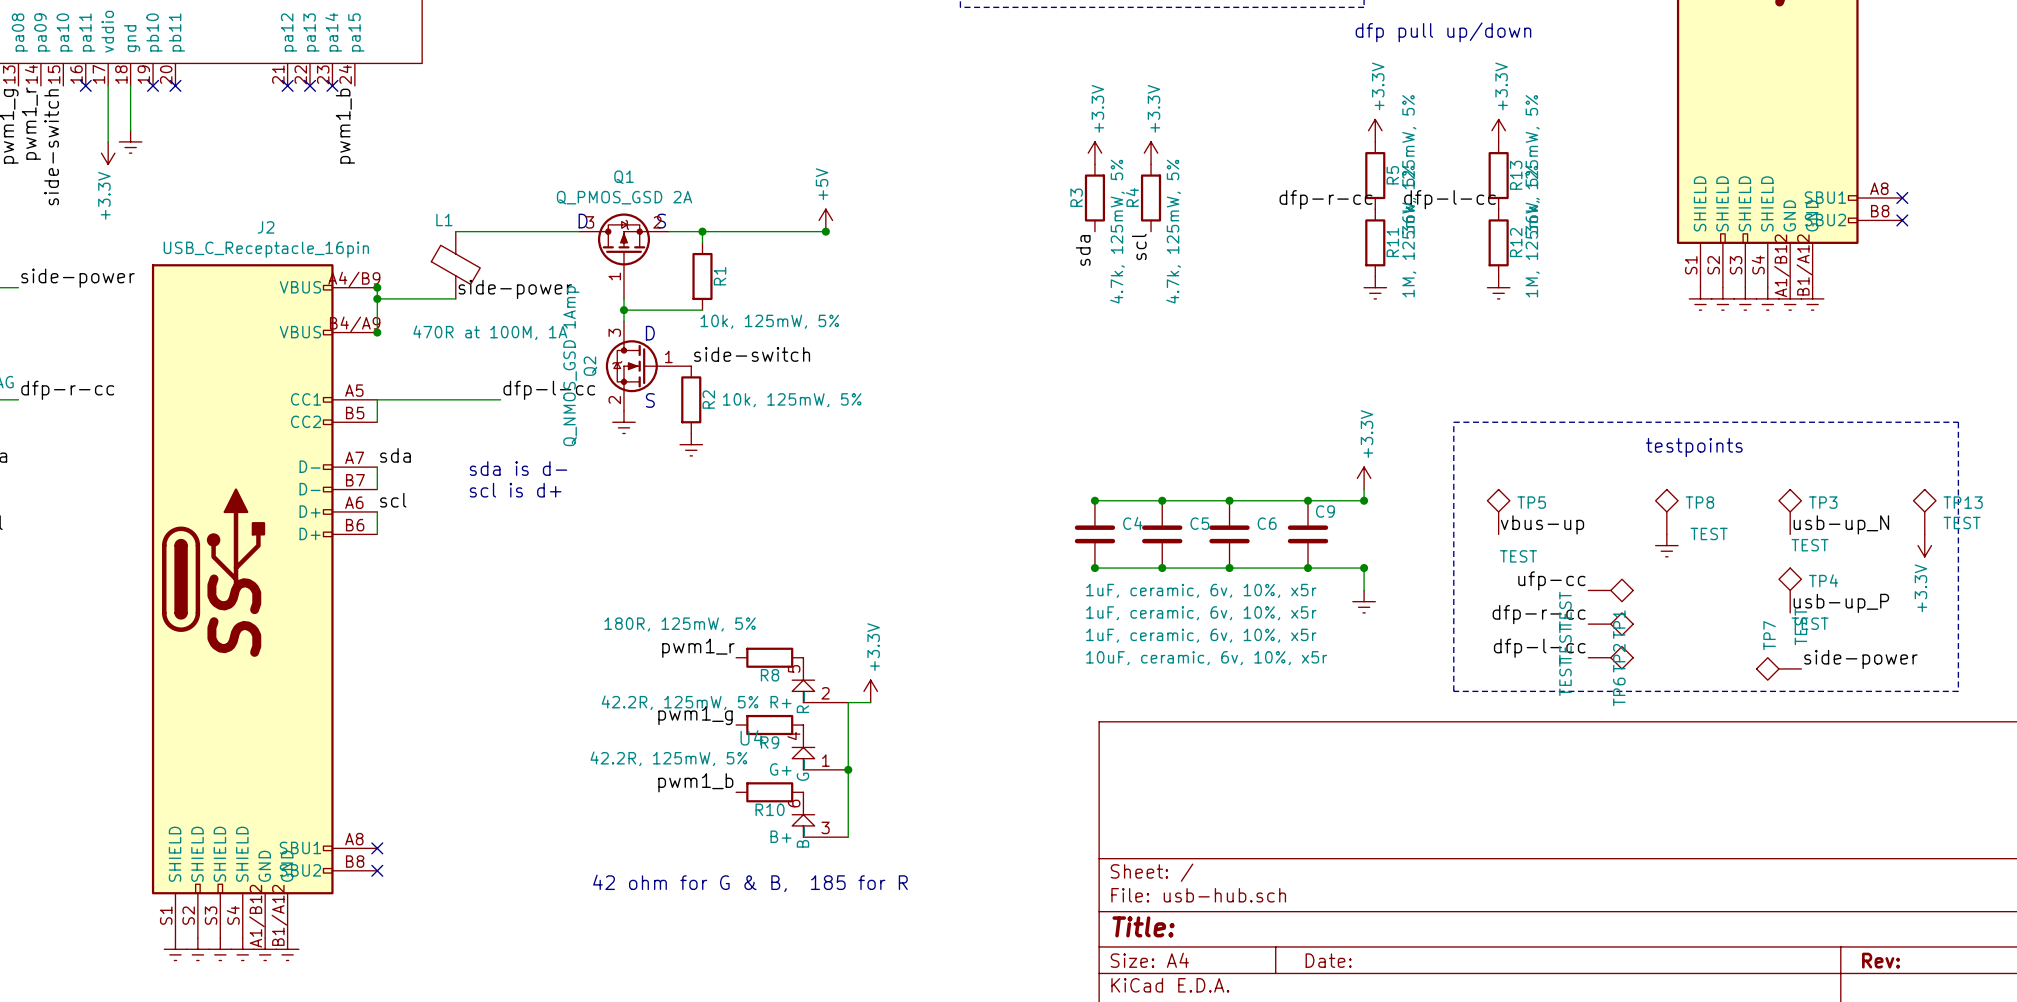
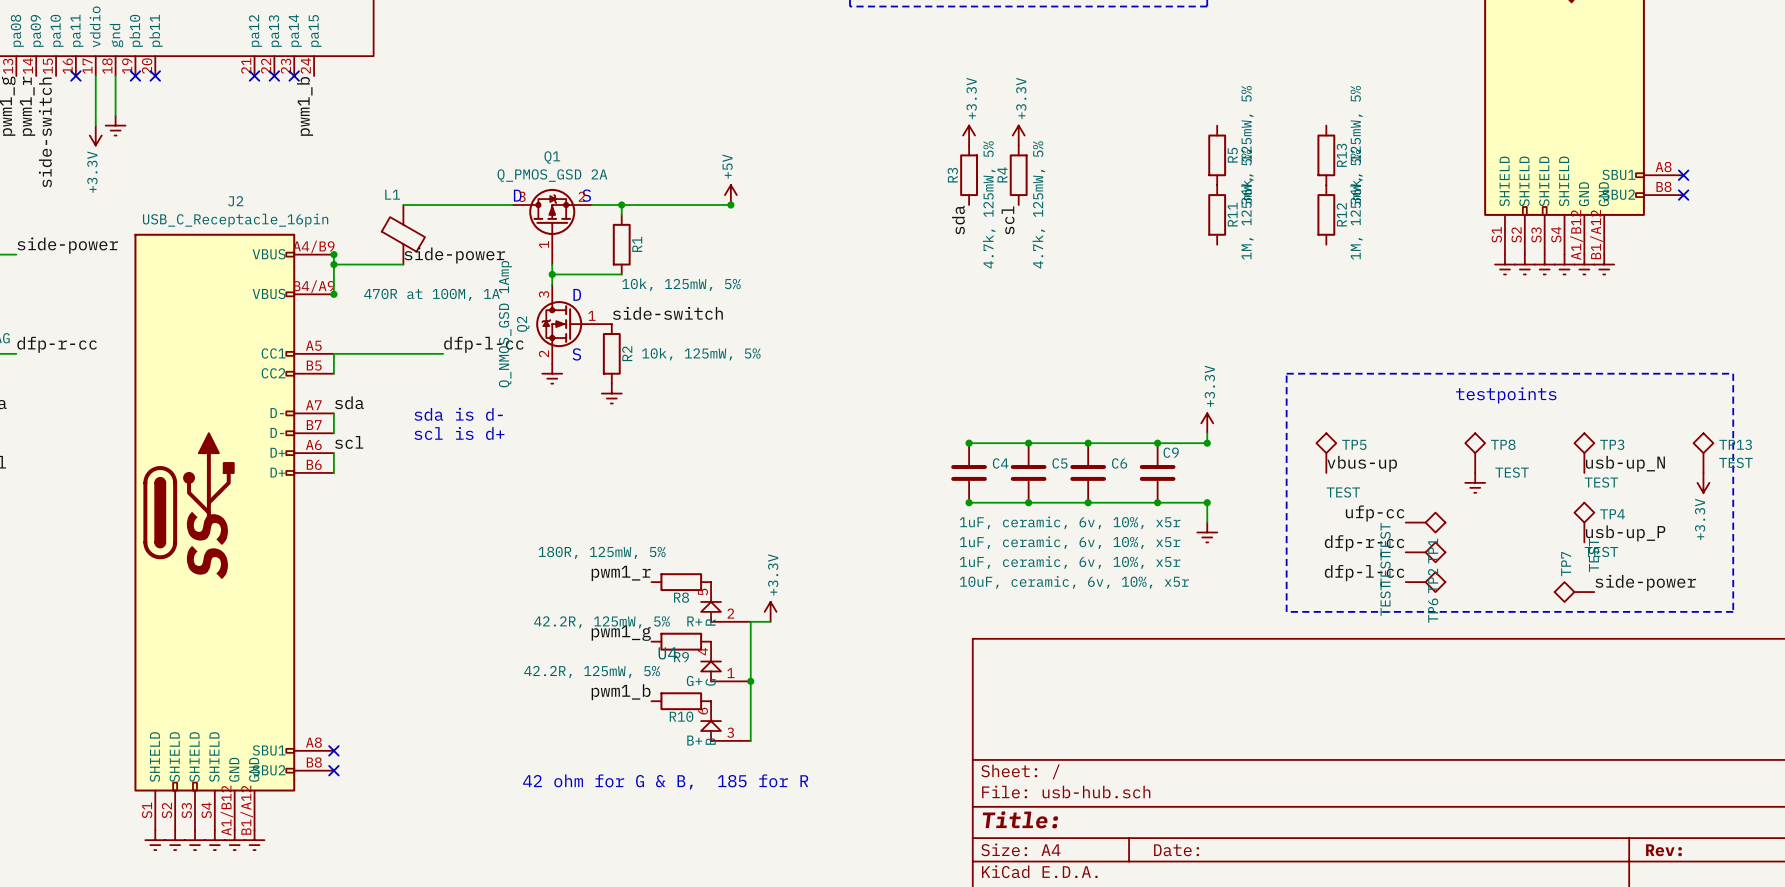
text: dfp pull up/down (1443, 32) -> none
power symbol: +3.3V (1375, 130) -> none
power symbol: +3.3V (1498, 130) -> none
label: dfp-r-cc (1326, 199) -> none
label: dfp-l-cc (1450, 199) -> none
power symbol: (1375, 287) -> none
power symbol: (1498, 287) -> none

